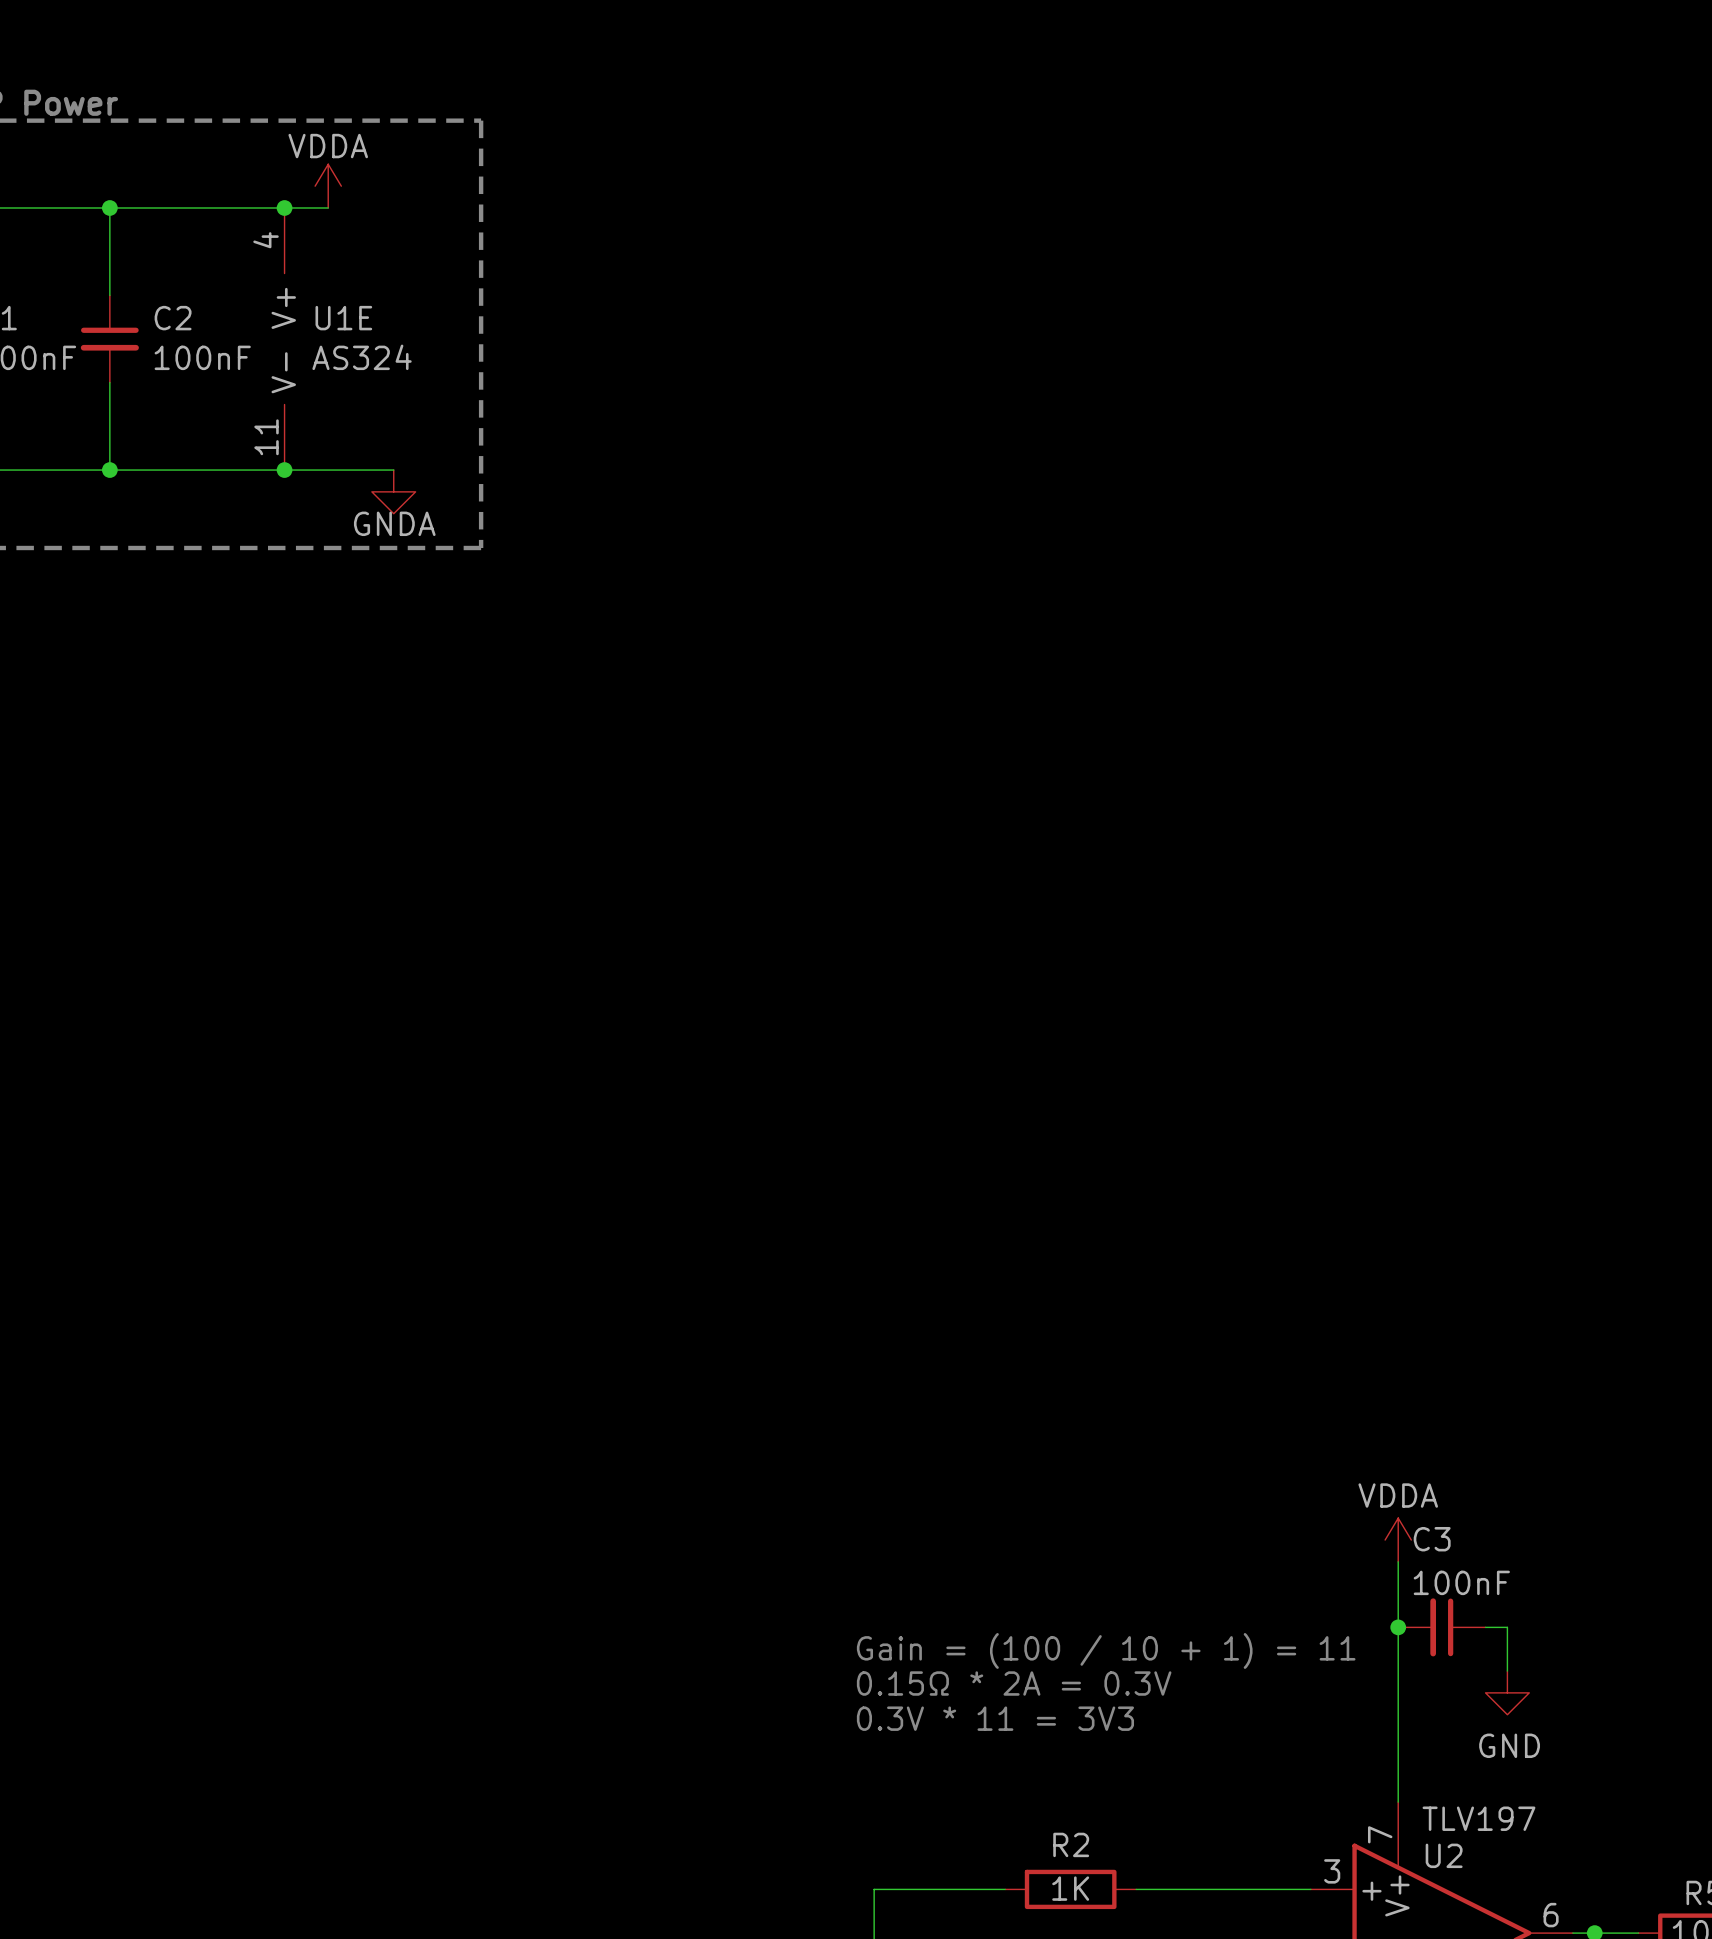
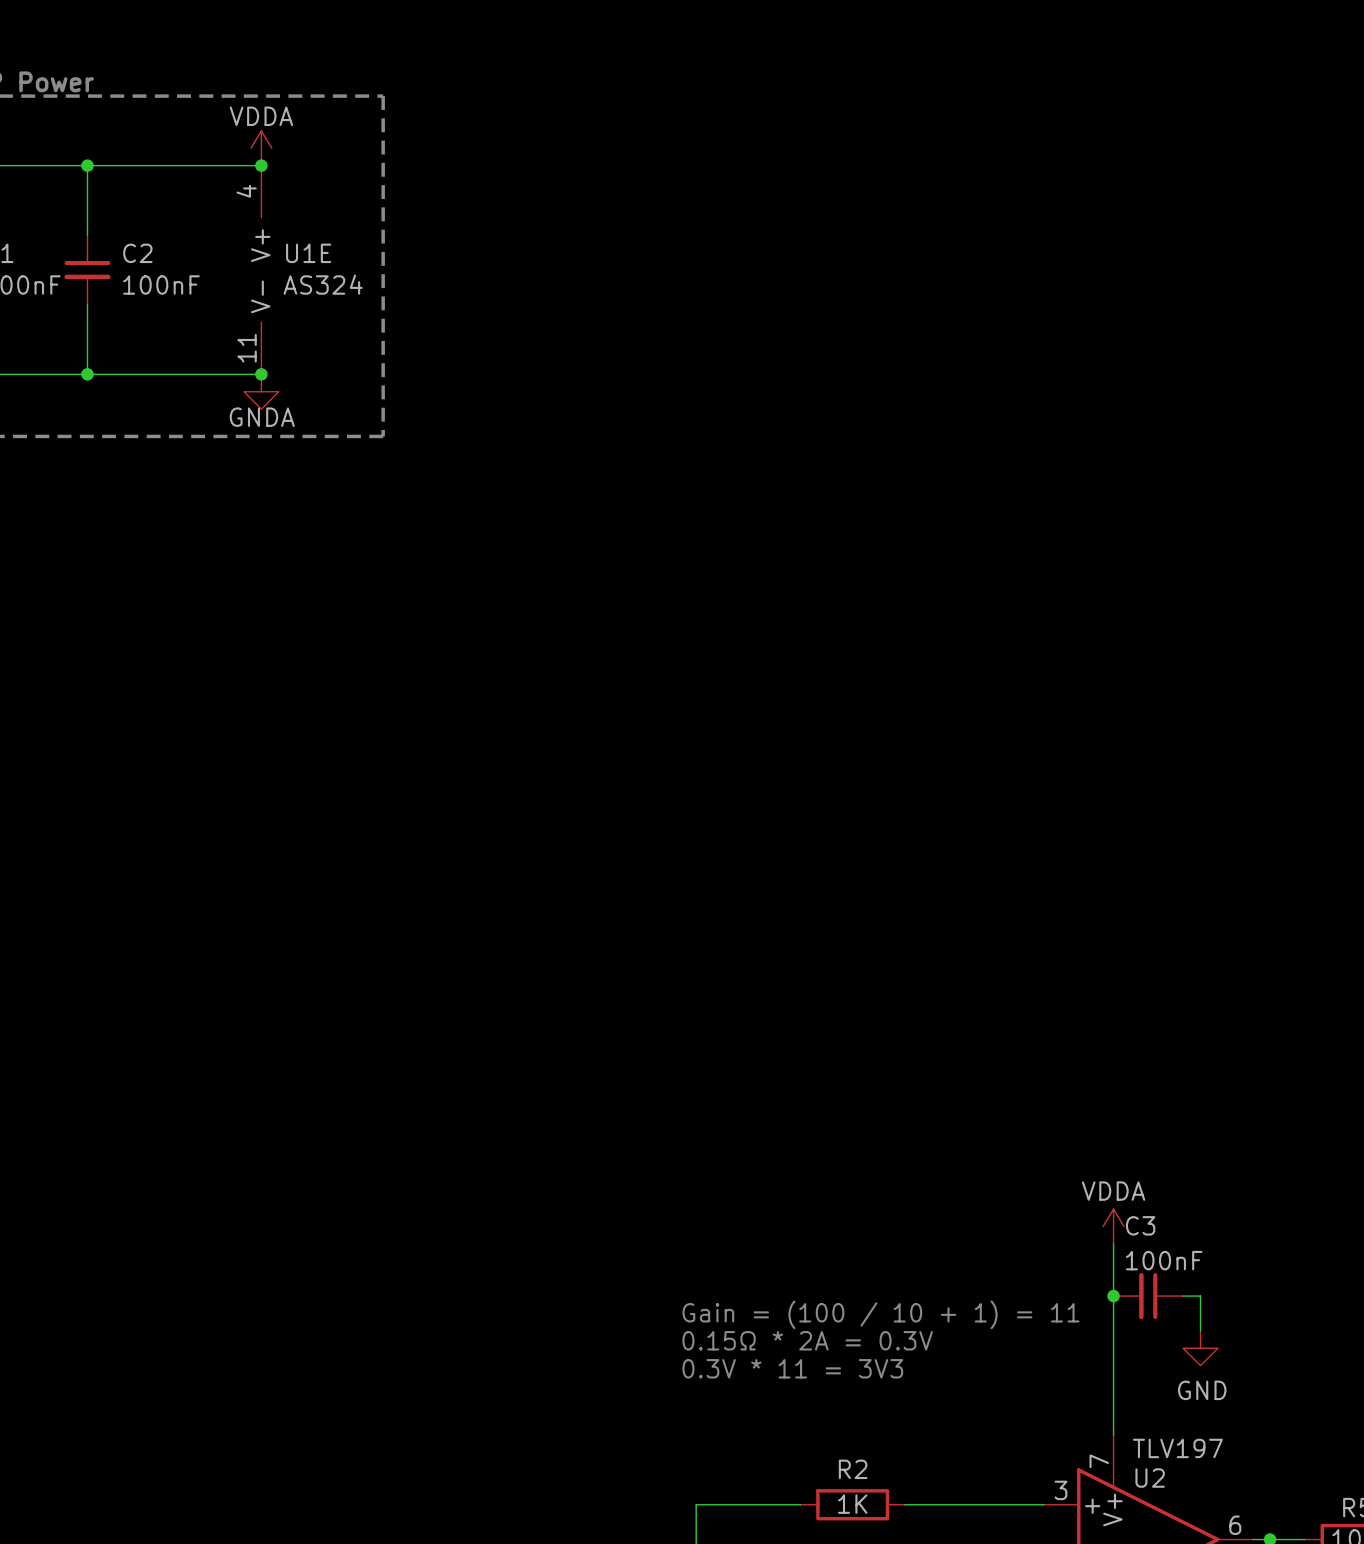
junction position: (284, 207) -> (261, 165)
U1E position: (284, 339) -> (261, 269)
junction position: (284, 470) -> (261, 374)
wire: (328, 470) (393, 470) -> none
power symbol position: GNDA (393, 491) -> GNDA (261, 391)

